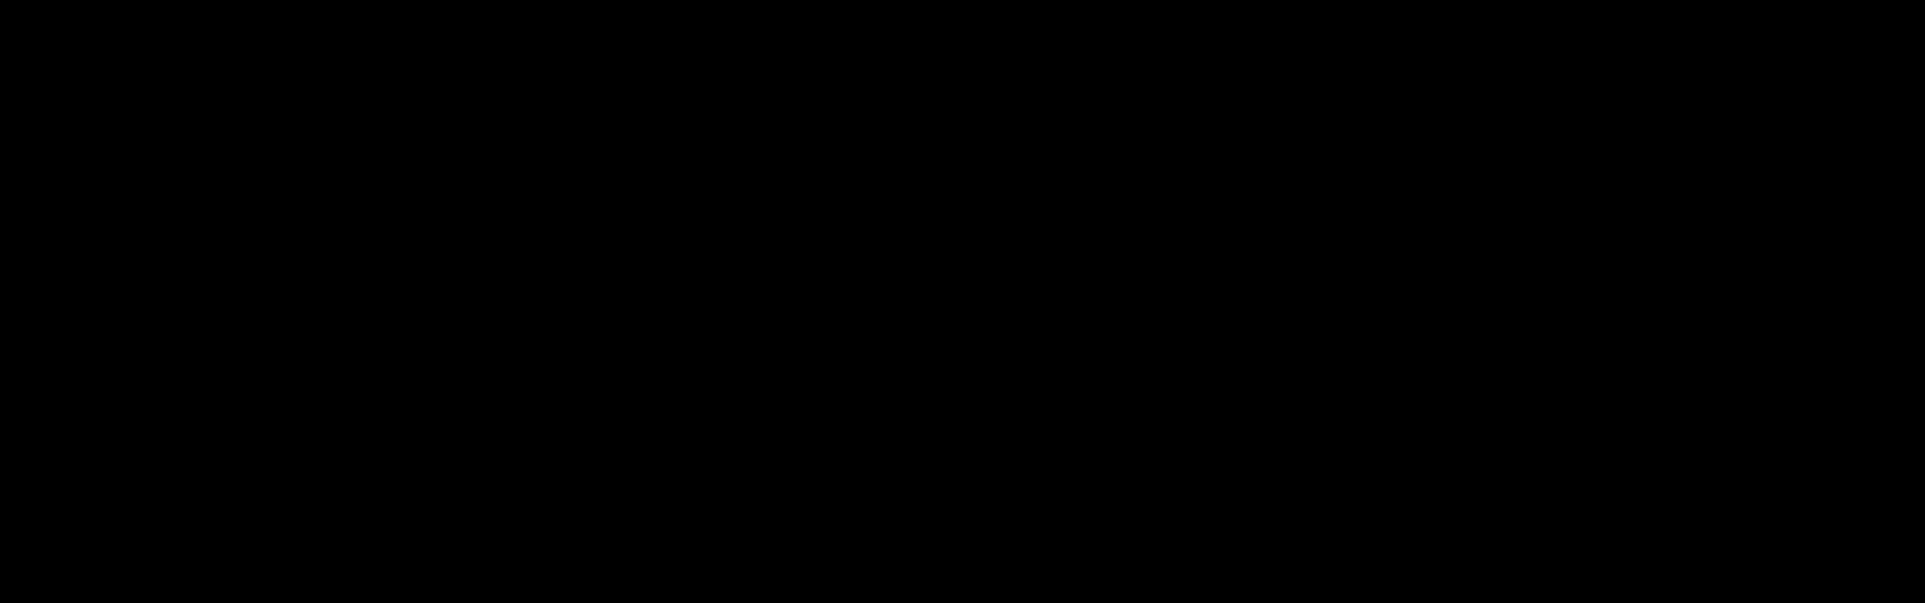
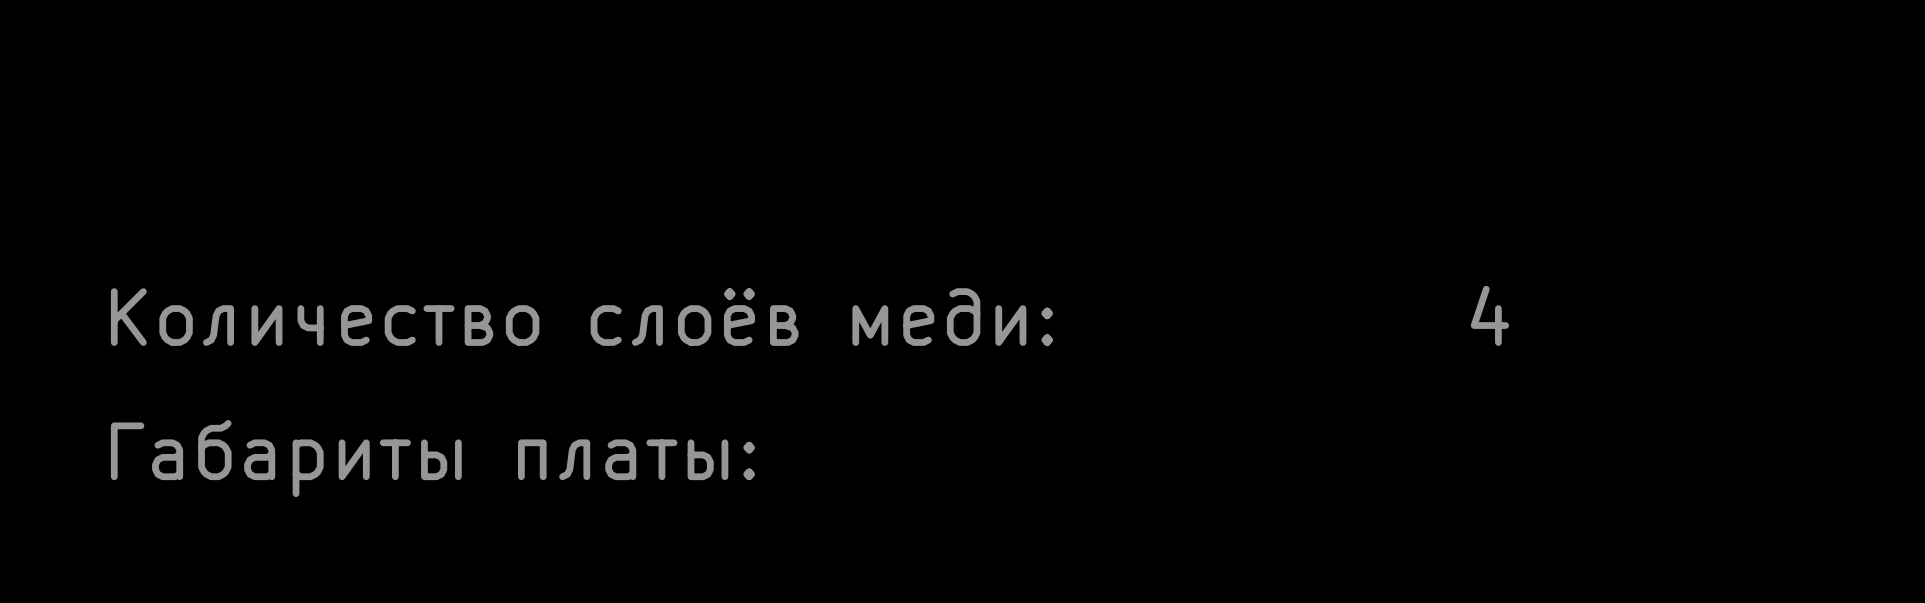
text: none -> 4 (1489, 315)
text: none -> Количество слоёв меди: (581, 317)
text: none -> Габариты платы: (432, 458)

